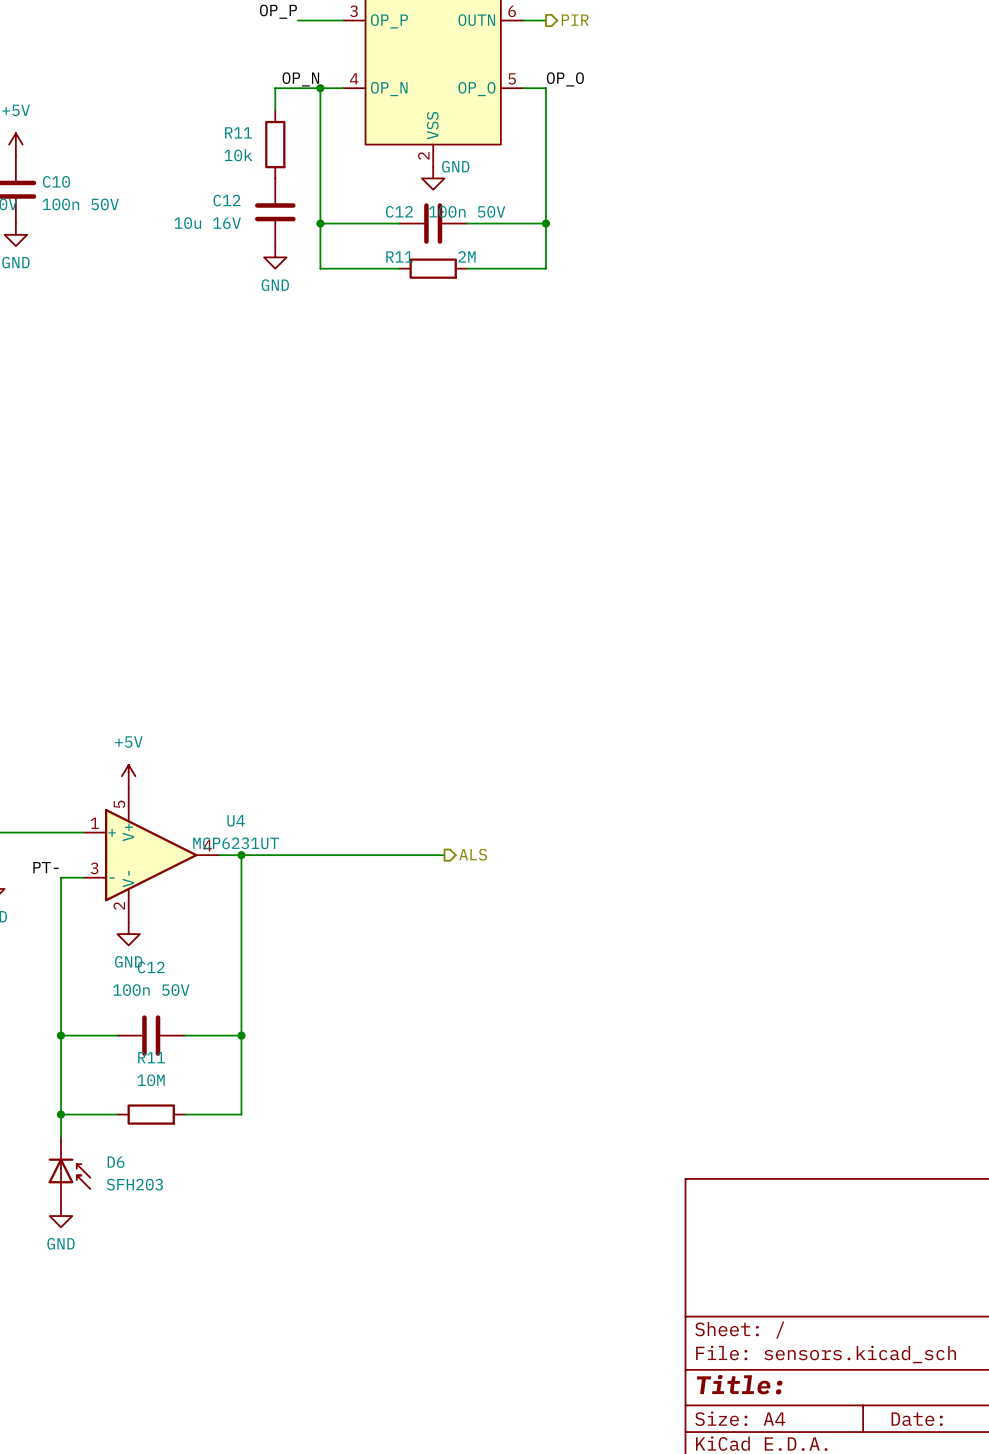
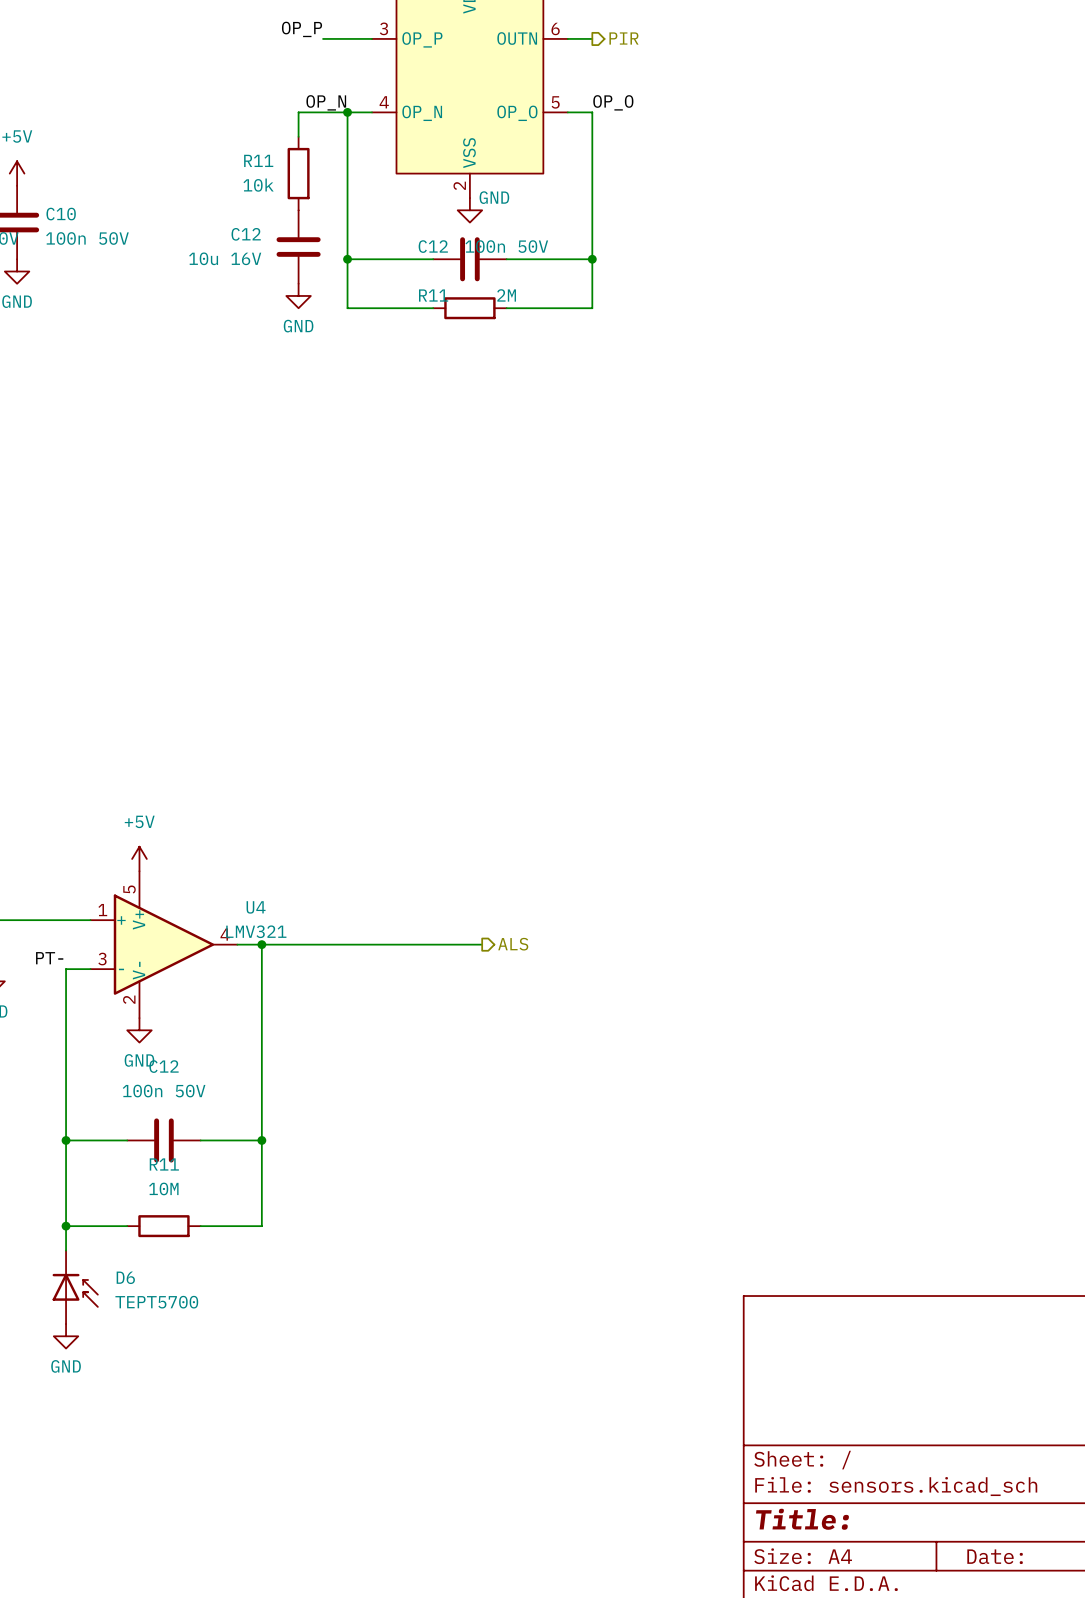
U4 value: MCP6231UT (236, 843) -> LMV321 (256, 931)
D6 value: SFH203 (134, 1184) -> TEPT5700 (156, 1302)

